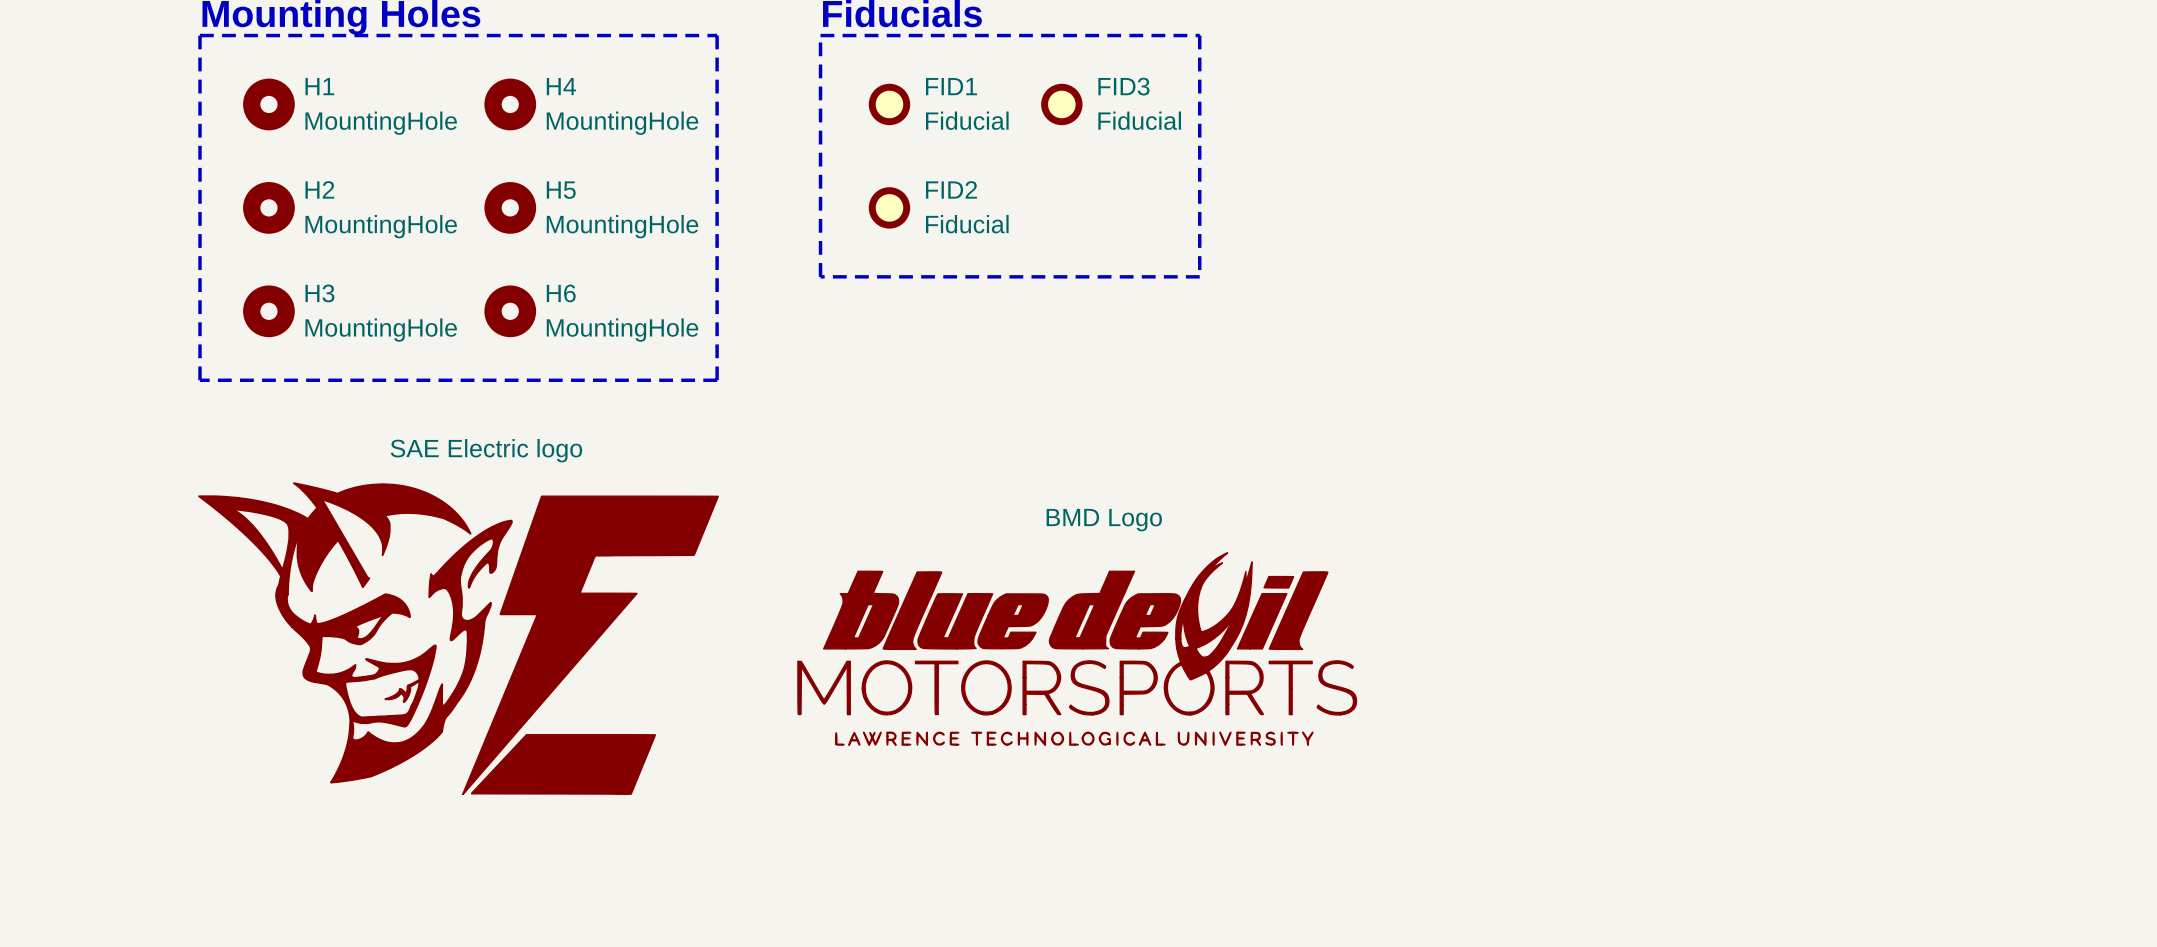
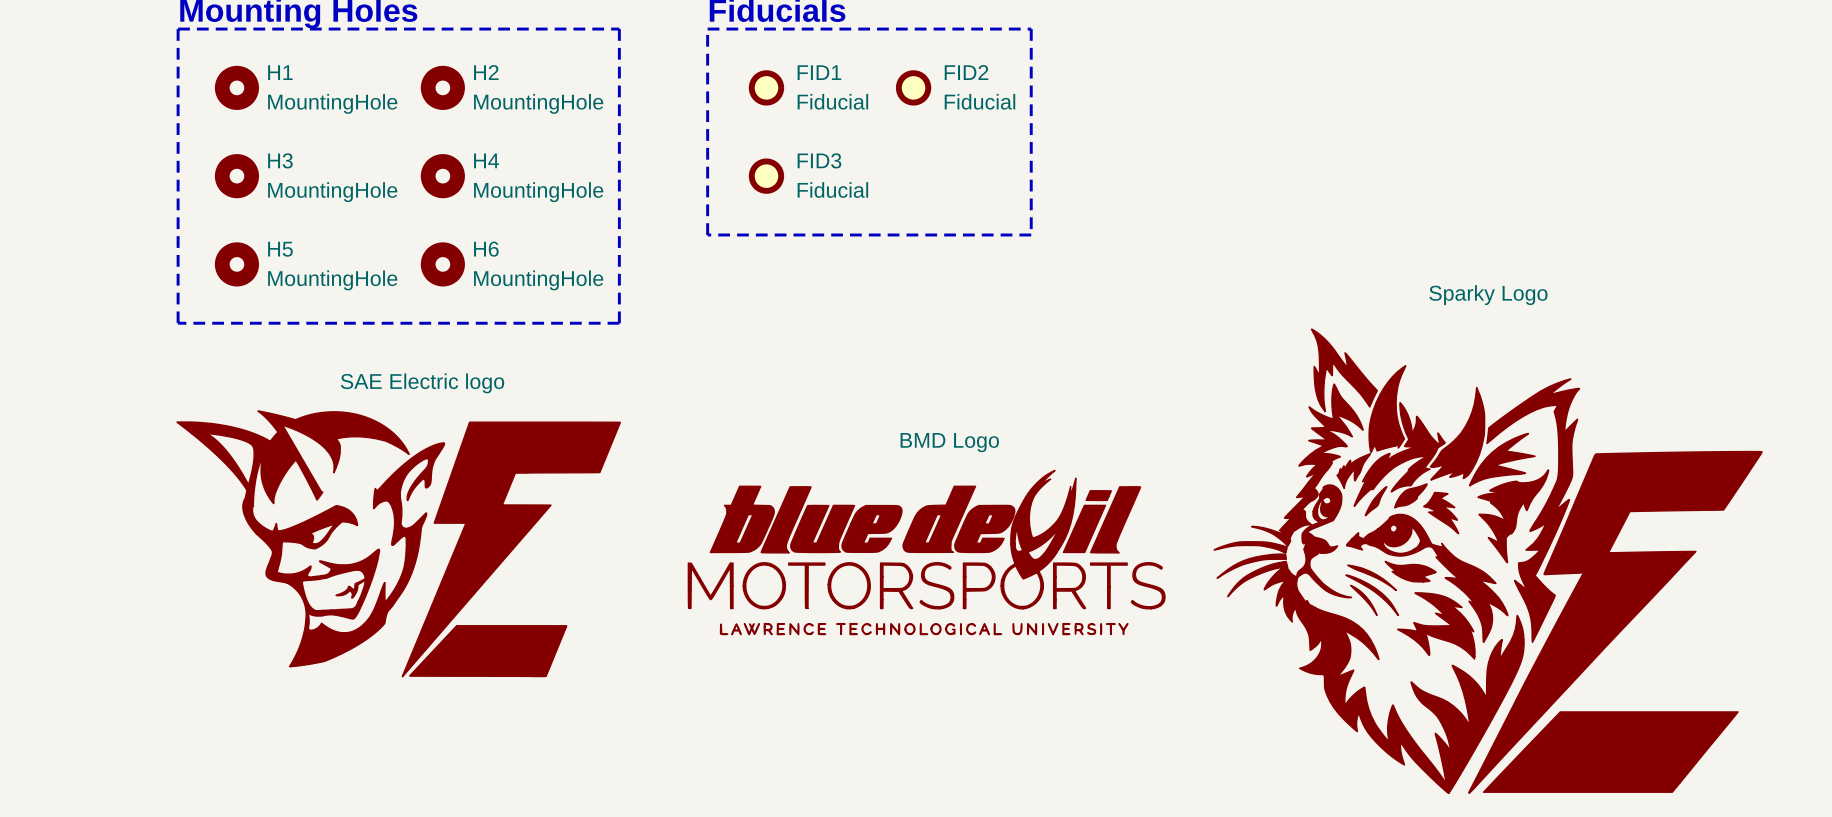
H4 name: H4 (561, 86) -> H2 (486, 72)
FID3 name: FID3 (1123, 86) -> FID2 (966, 72)
H2 name: H2 (319, 189) -> H3 (280, 160)
FID2 name: FID2 (951, 189) -> FID3 (819, 160)
H5 name: H5 (561, 190) -> H4 (486, 160)
H3 name: H3 (319, 293) -> H5 (280, 249)
part: none -> Sparky Logo (1488, 561)

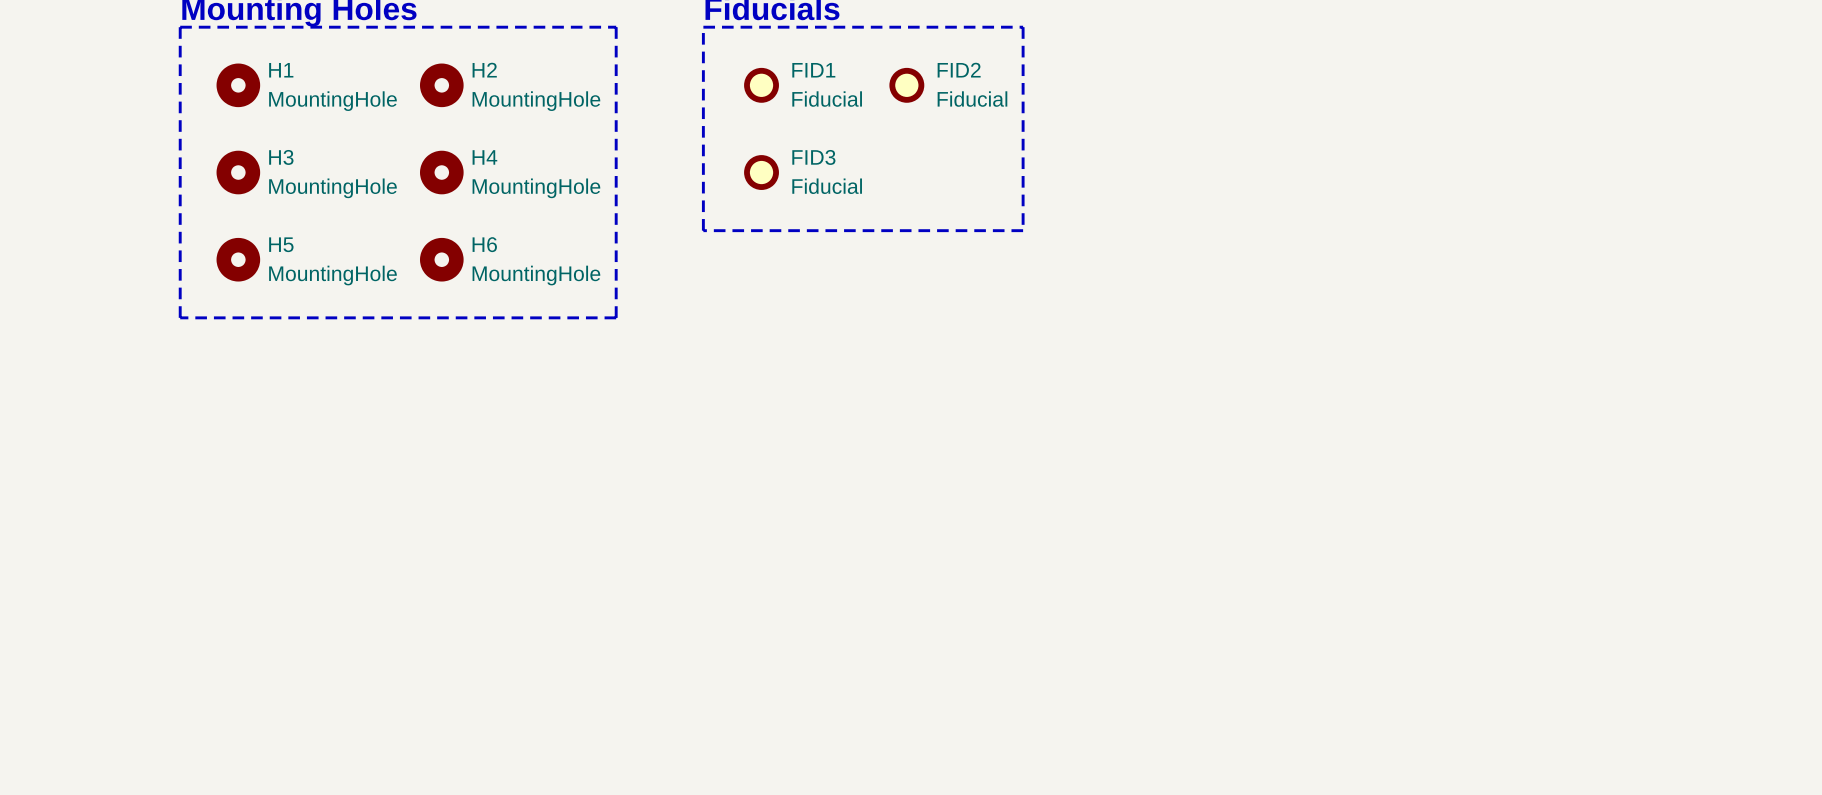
part: SAE Electric logo (398, 543) -> none
part: BMD Logo (926, 552) -> none
part: Sparky Logo (1488, 561) -> none

